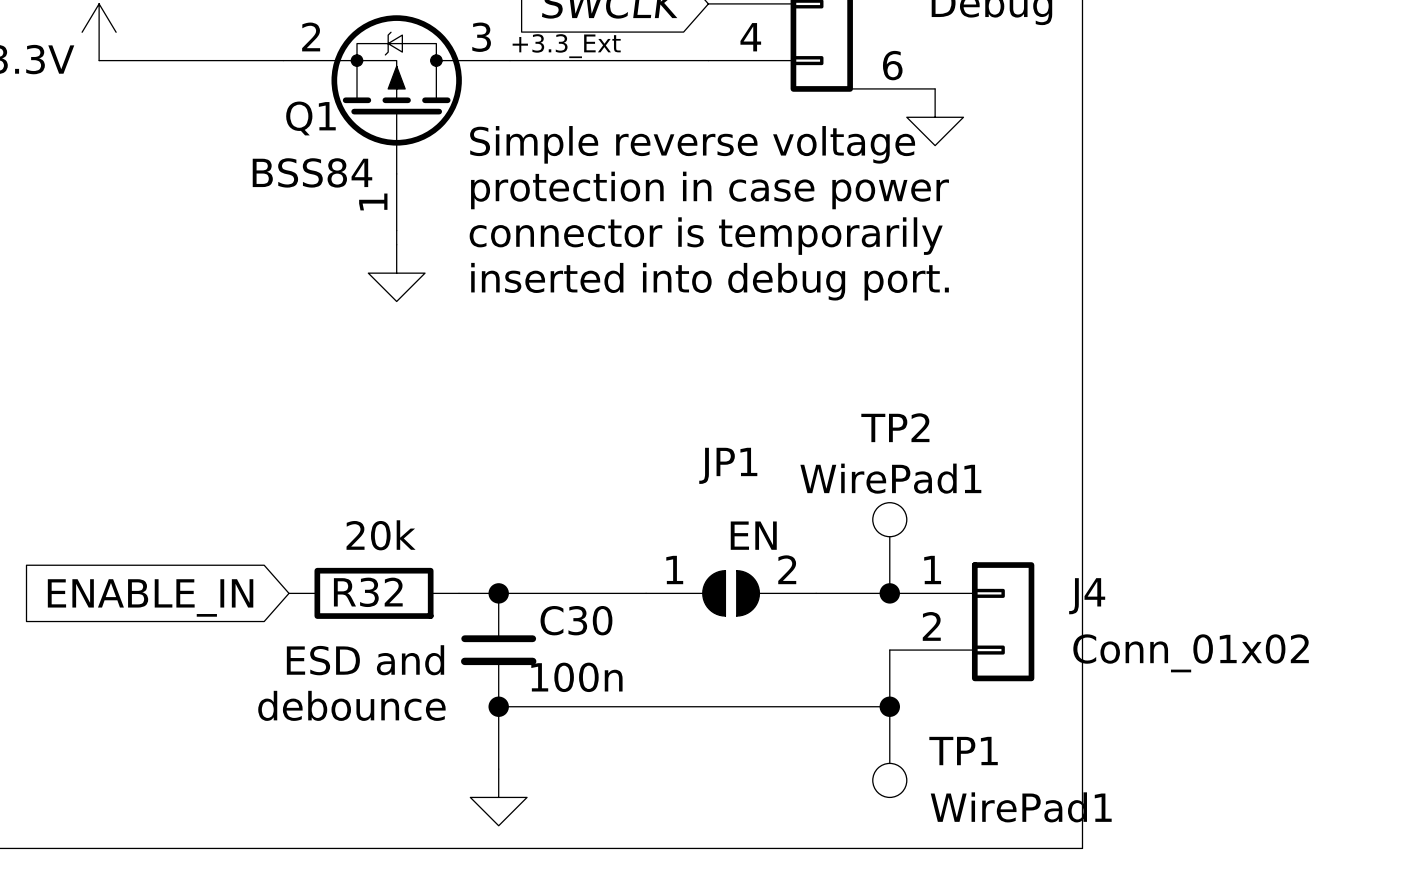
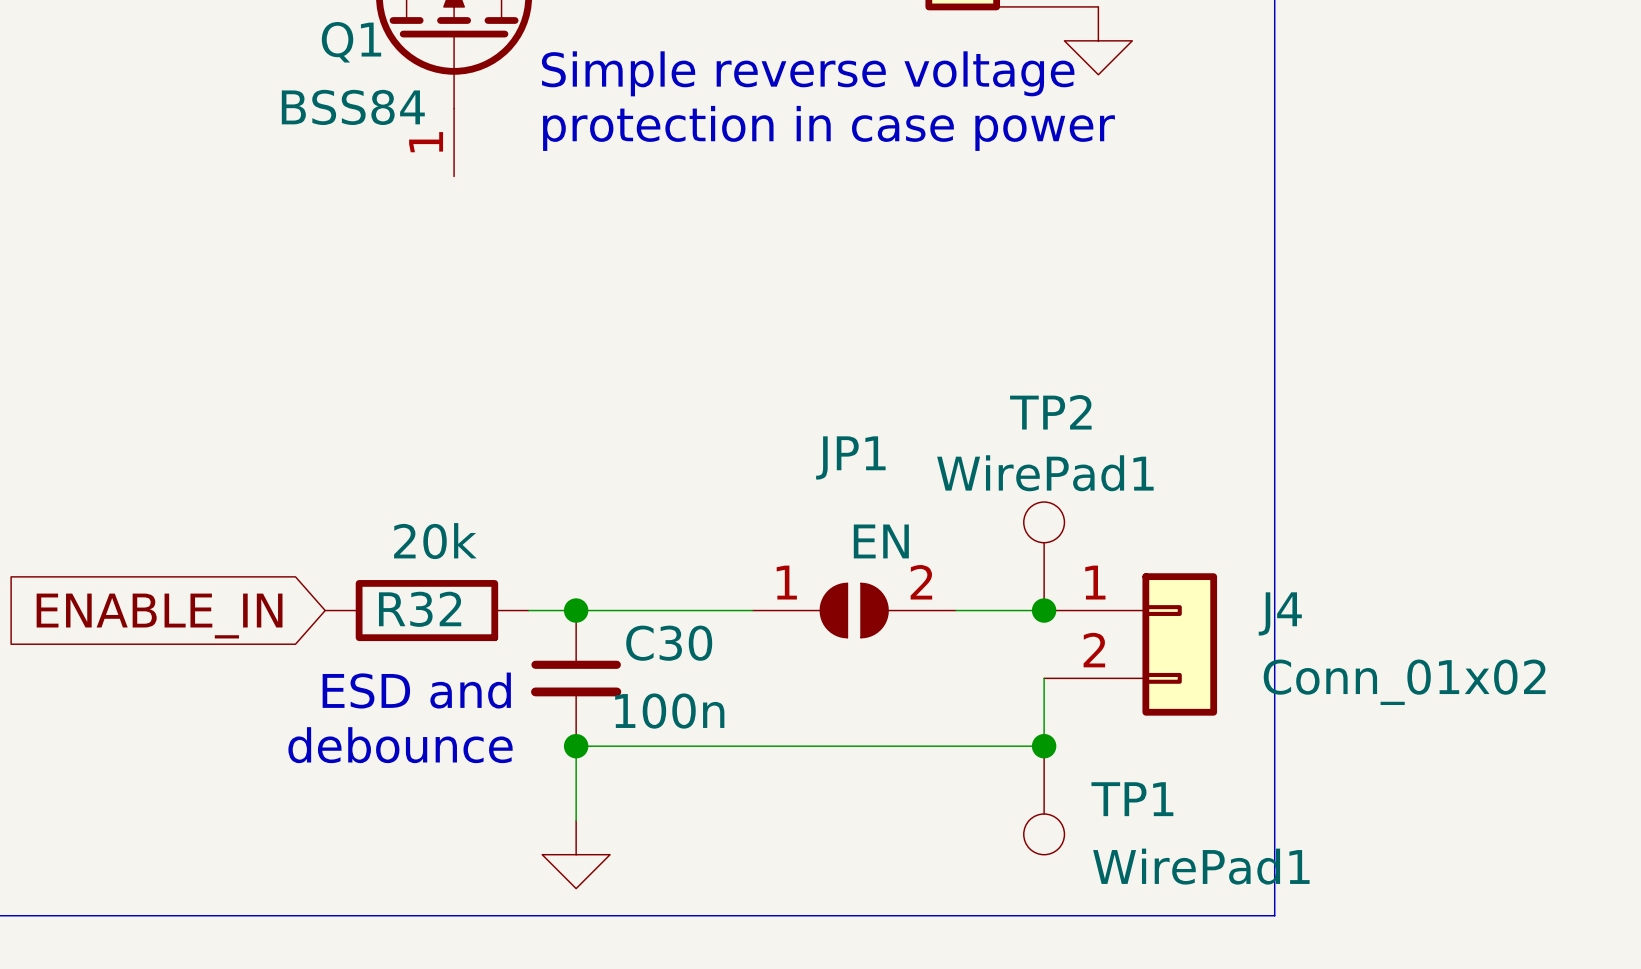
wire: (396, 230) (396, 244) -> none
text: connector is temporarily (706, 236) -> none
power symbol: (396, 273) -> none
text: inserted into debug port. (710, 281) -> none

